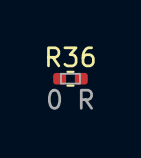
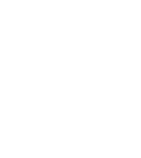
R36: 0 R (70, 78) -> none

